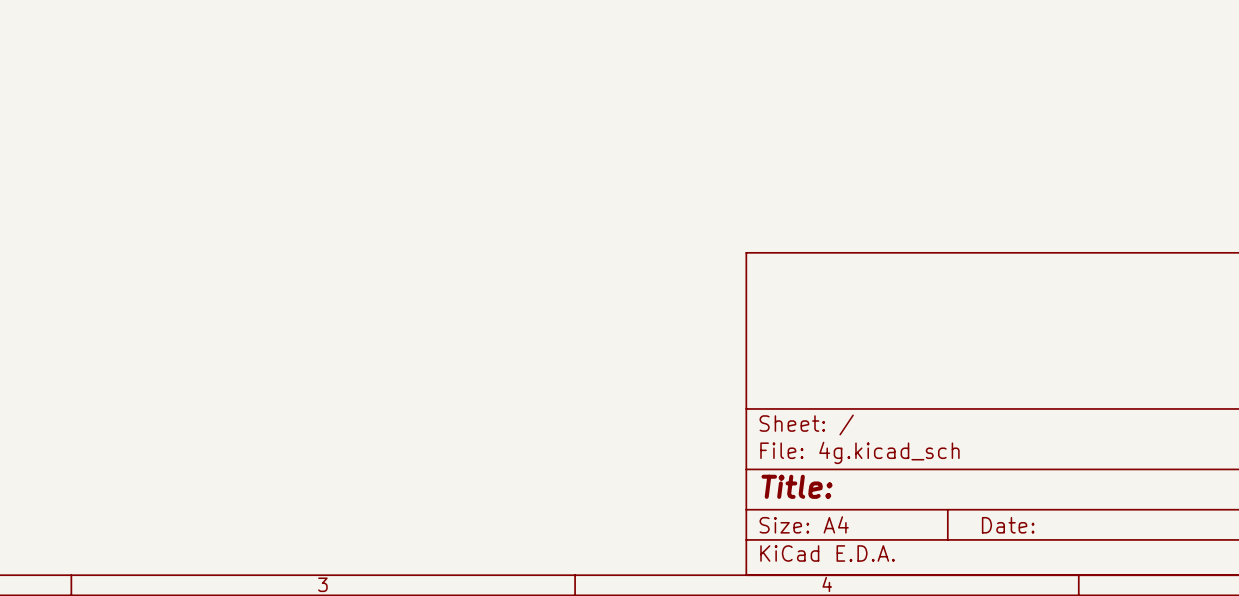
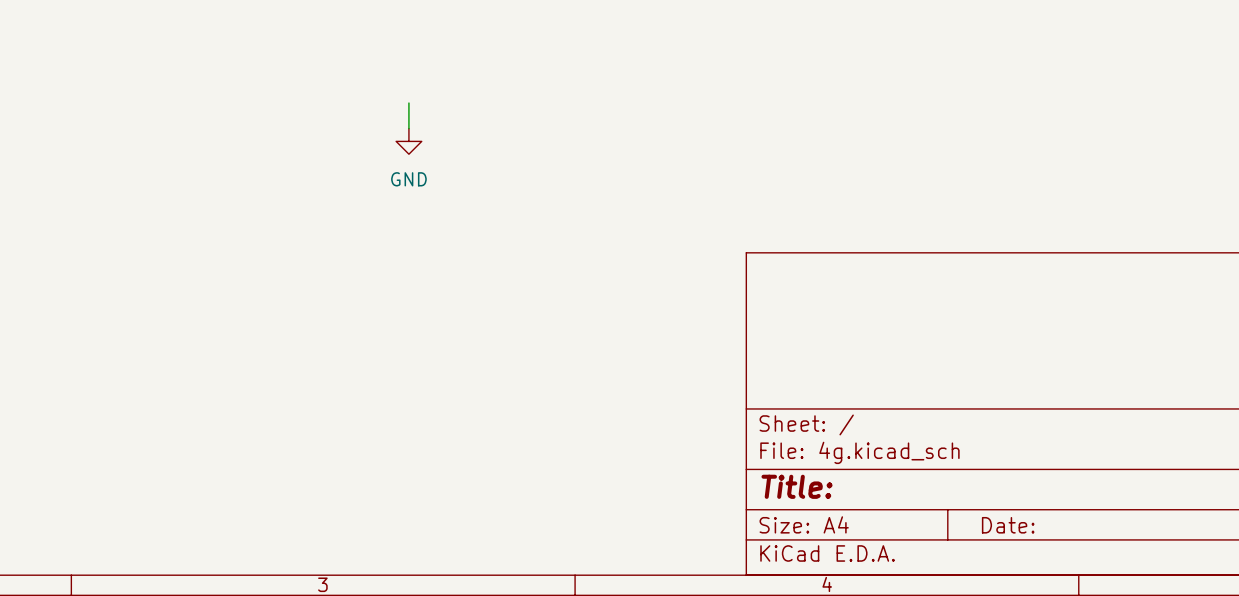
wire: none -> (408, 103) (408, 128)
power symbol: none -> GND (408, 141)

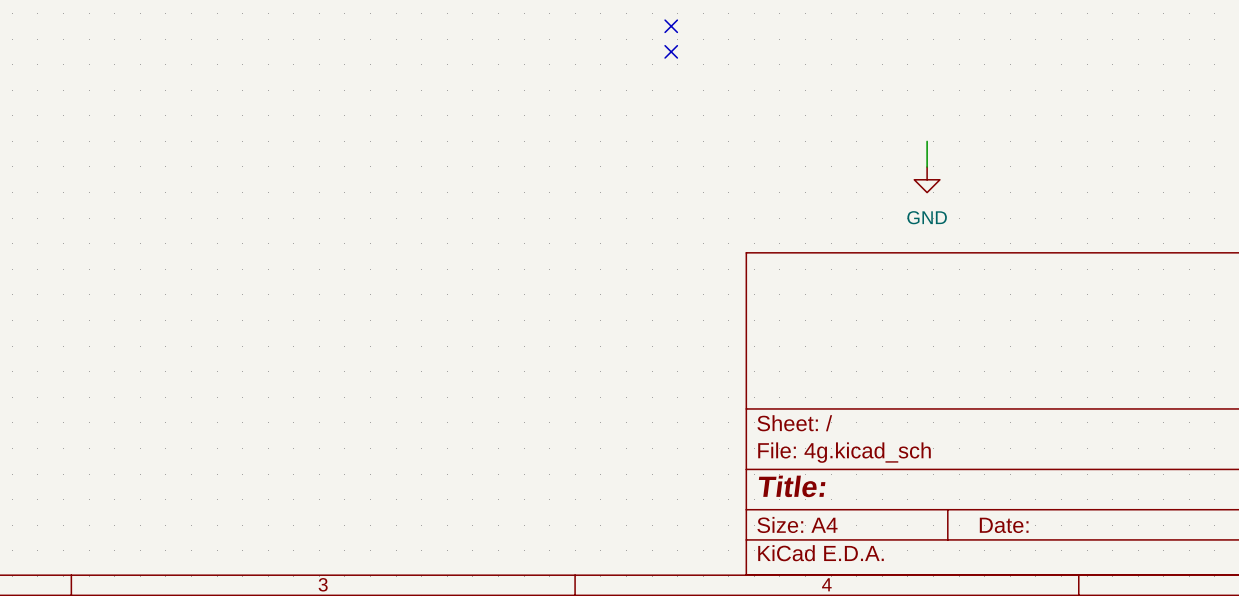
no-connect mark: none -> (671, 26)
no-connect mark: none -> (671, 51)
wire: (408, 103) (408, 128) -> none
power symbol: GND (408, 141) -> none
wire: none -> (927, 141) (927, 166)
power symbol: none -> GND (927, 179)

